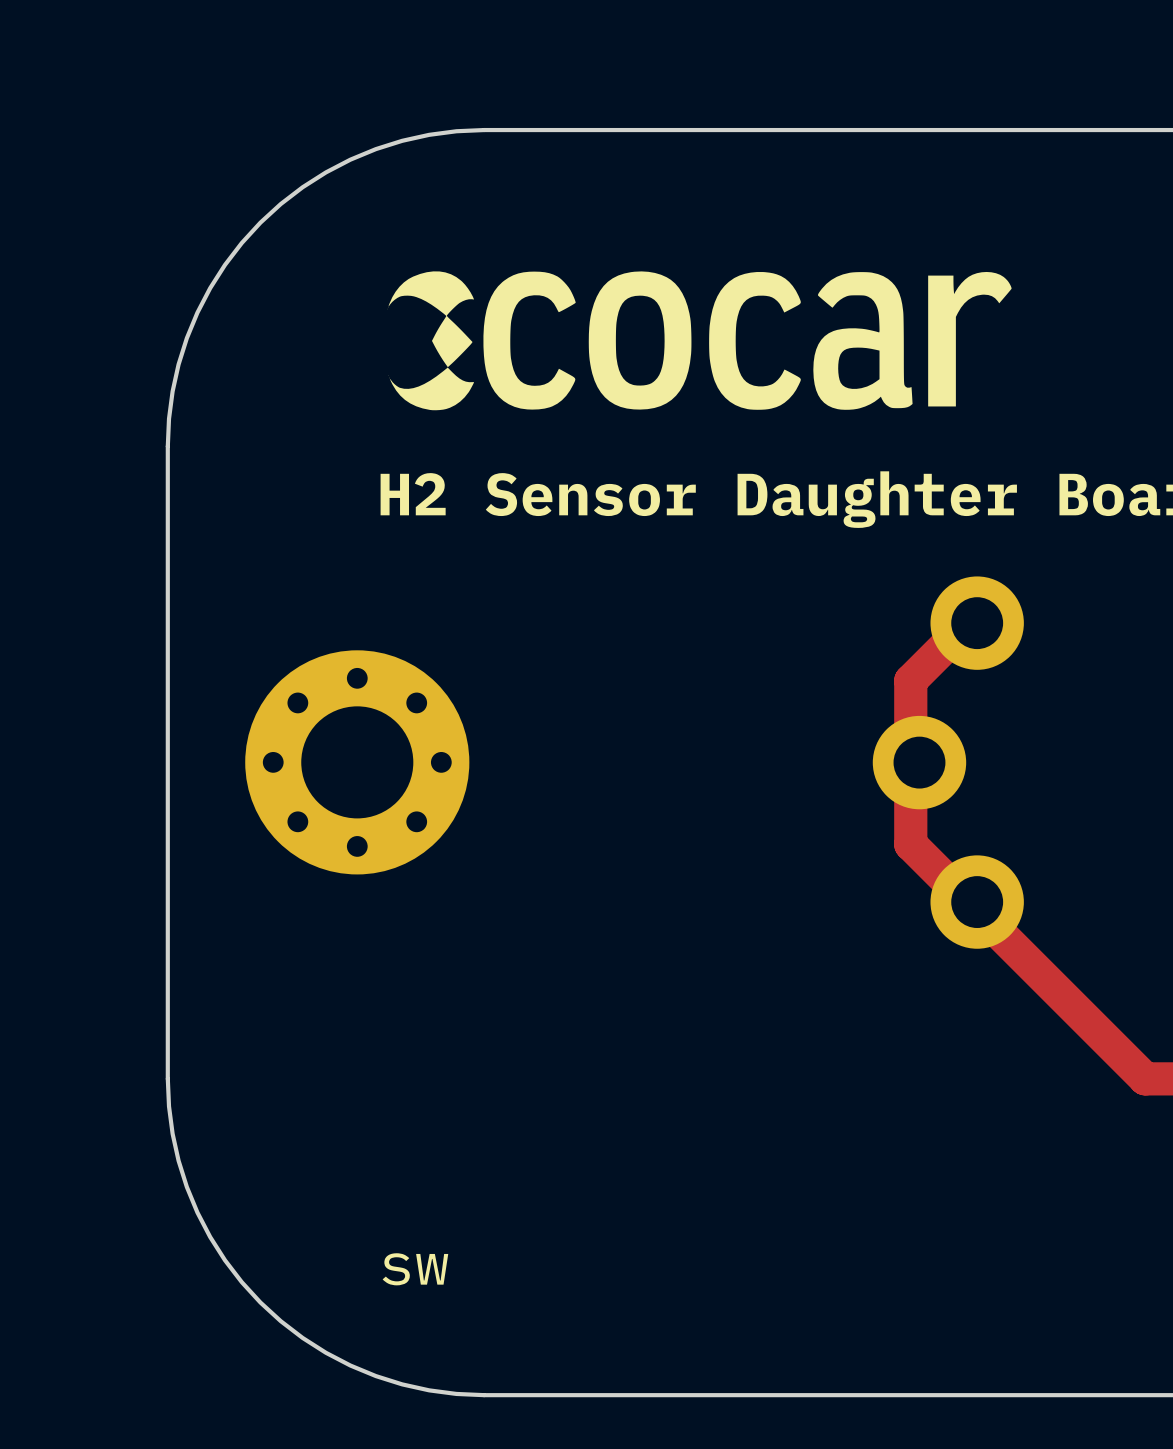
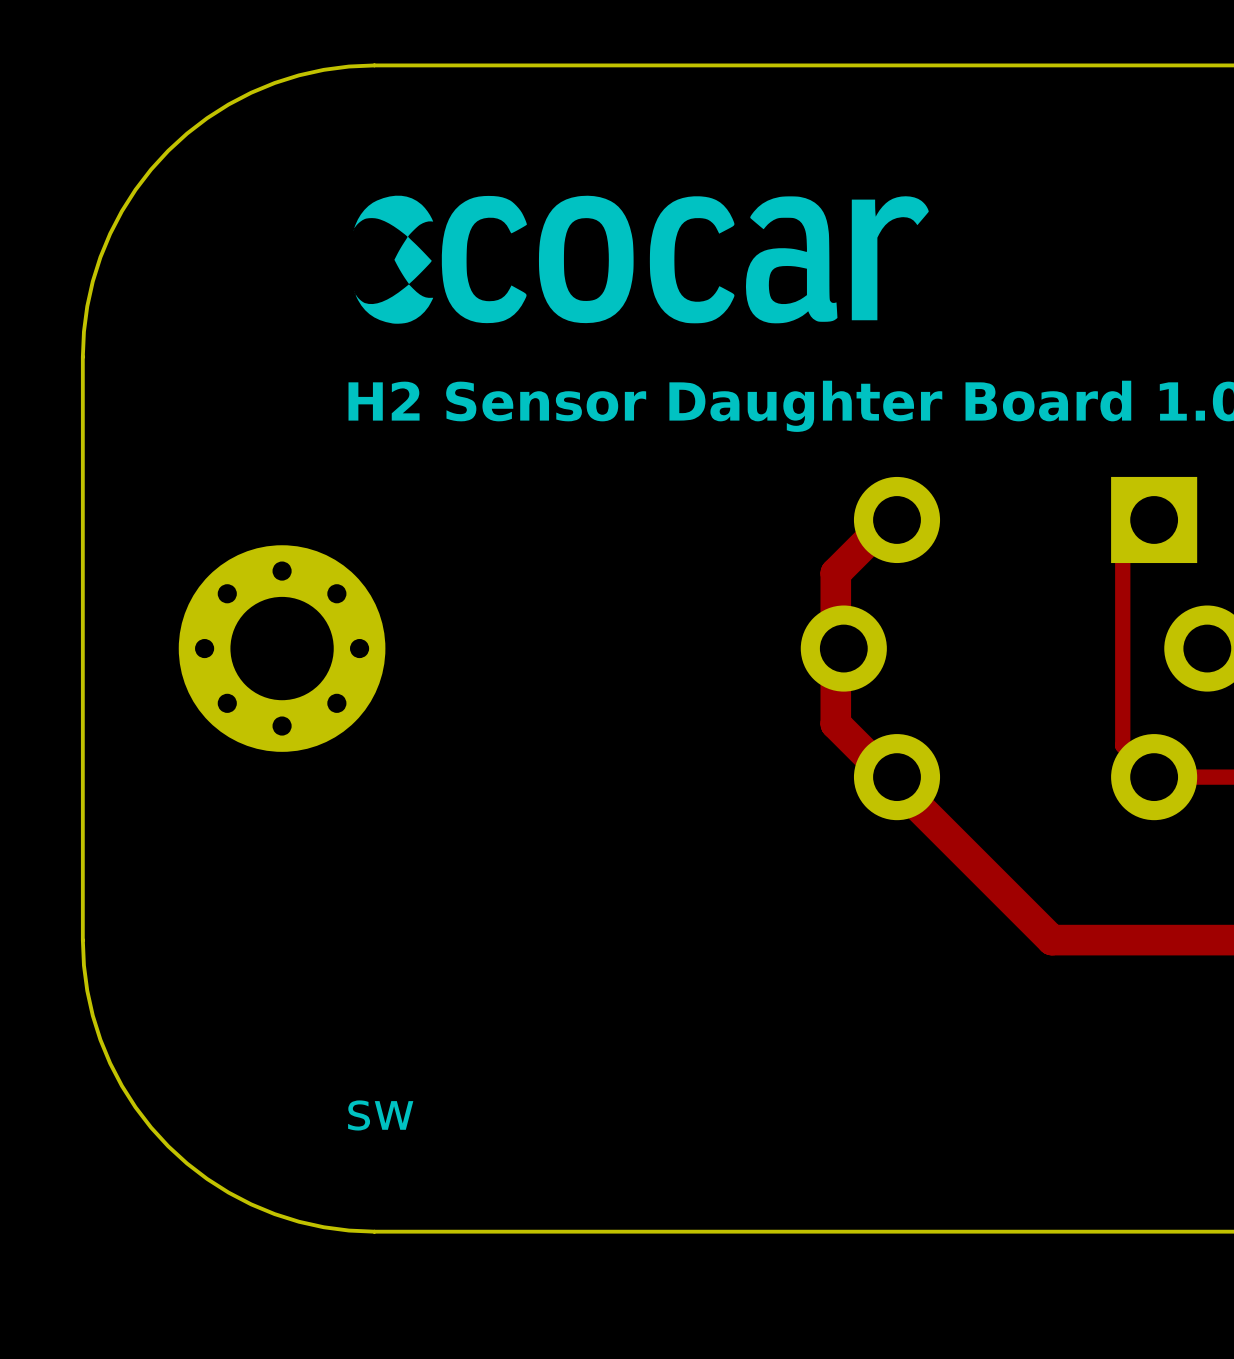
board edge: (484, 130) (456, 131) (402, 140) (350, 159) (302, 187) (260, 222) (225, 264) (197, 312) (178, 364) (169, 418) (167, 446) (167, 1078) (172, 1133) (186, 1187) (210, 1237) (241, 1282) (260, 1302) (302, 1337) (350, 1365) (375, 1376) (429, 1390) (484, 1395) -> (442, 65) (349, 66) (298, 75) (251, 92) (207, 118) (187, 133) (151, 169) (135, 189) (110, 233) (92, 281) (83, 331) (82, 356) (82, 940) (87, 990) (100, 1039) (121, 1085) (151, 1127) (187, 1163) (228, 1192) (274, 1214) (323, 1227) (374, 1231) (442, 1231)
part position: (357, 762) -> (282, 648)

